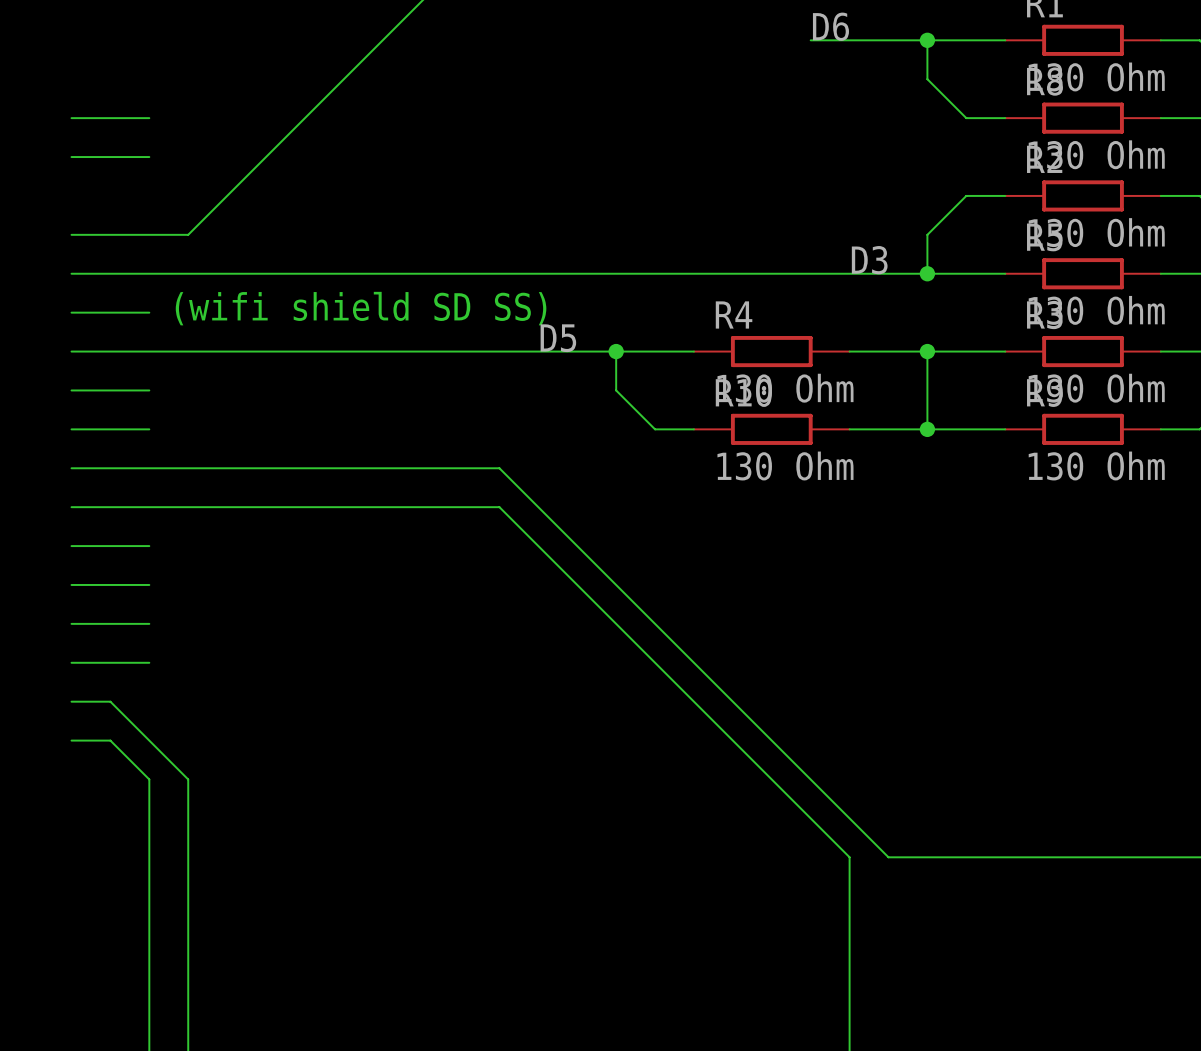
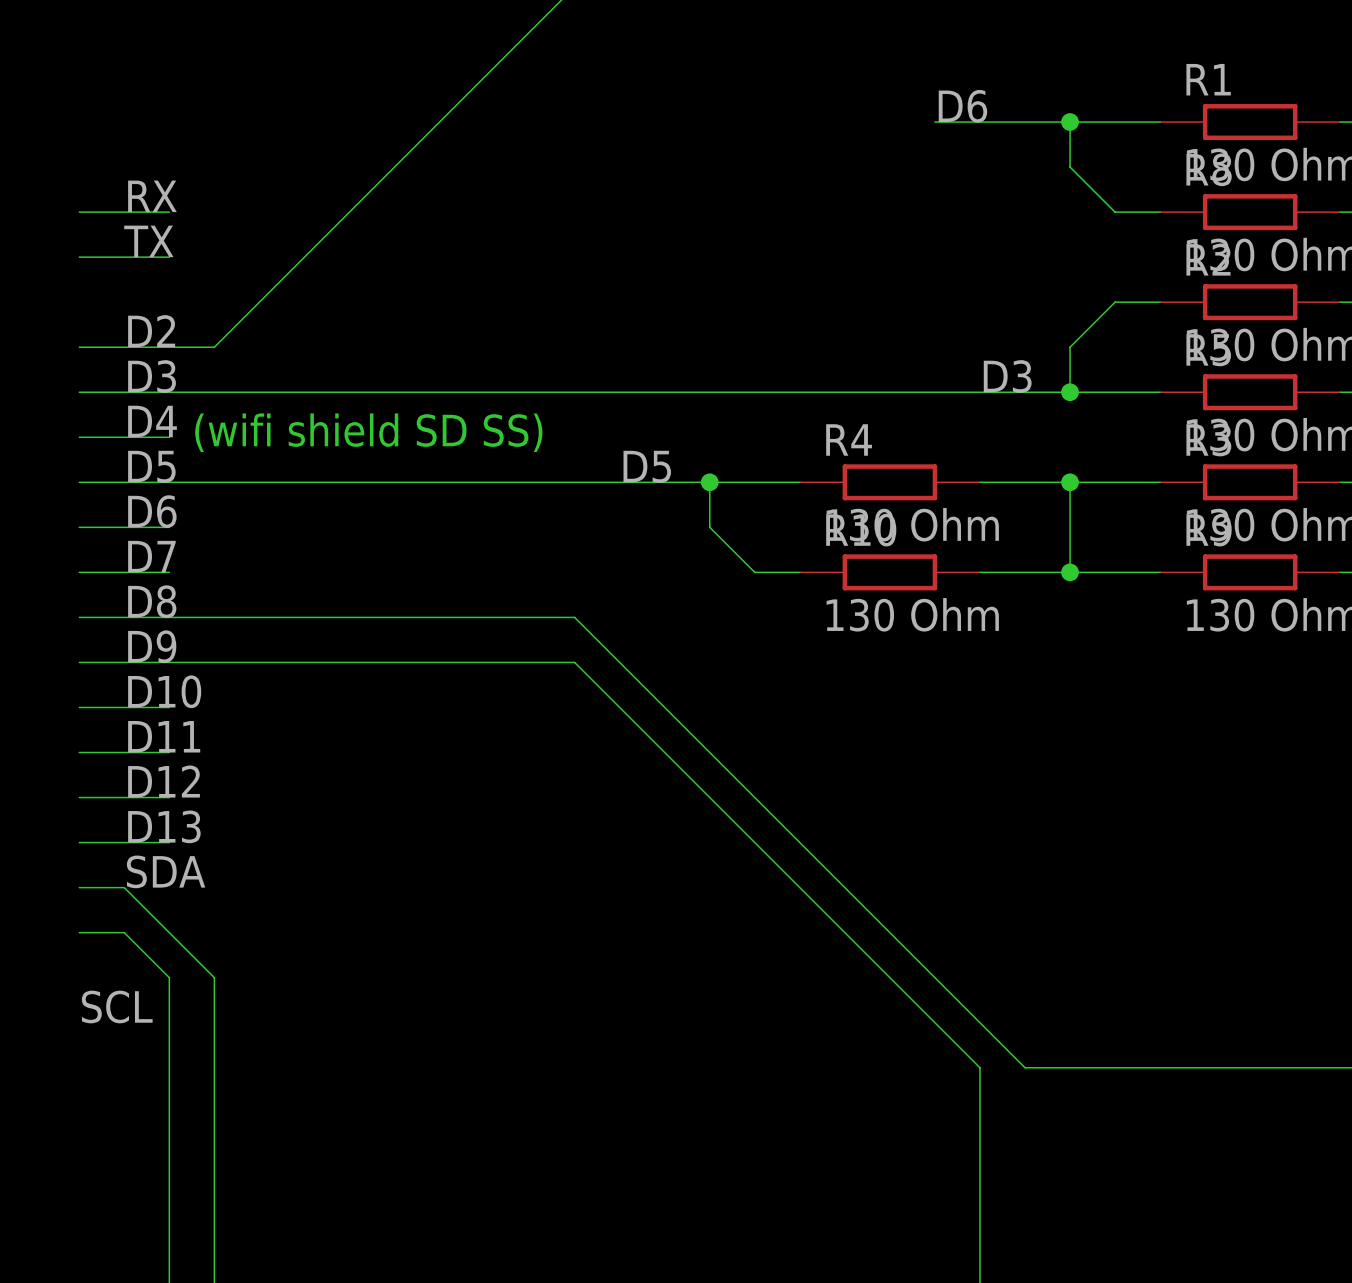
label: none -> RX (152, 196)
label: none -> TX (148, 241)
label: none -> D2 (151, 331)
label: none -> D3 (152, 376)
label: none -> D4 (152, 421)
label: none -> D5 (151, 466)
label: none -> D6 (152, 511)
label: none -> D7 (151, 556)
label: none -> D8 (152, 601)
label: none -> D9 (152, 646)
label: none -> D10 (164, 691)
label: none -> D11 (164, 736)
label: none -> D12 (164, 781)
label: none -> D13 (164, 826)
label: none -> SDA (166, 871)
label: none -> SCL (117, 1006)

